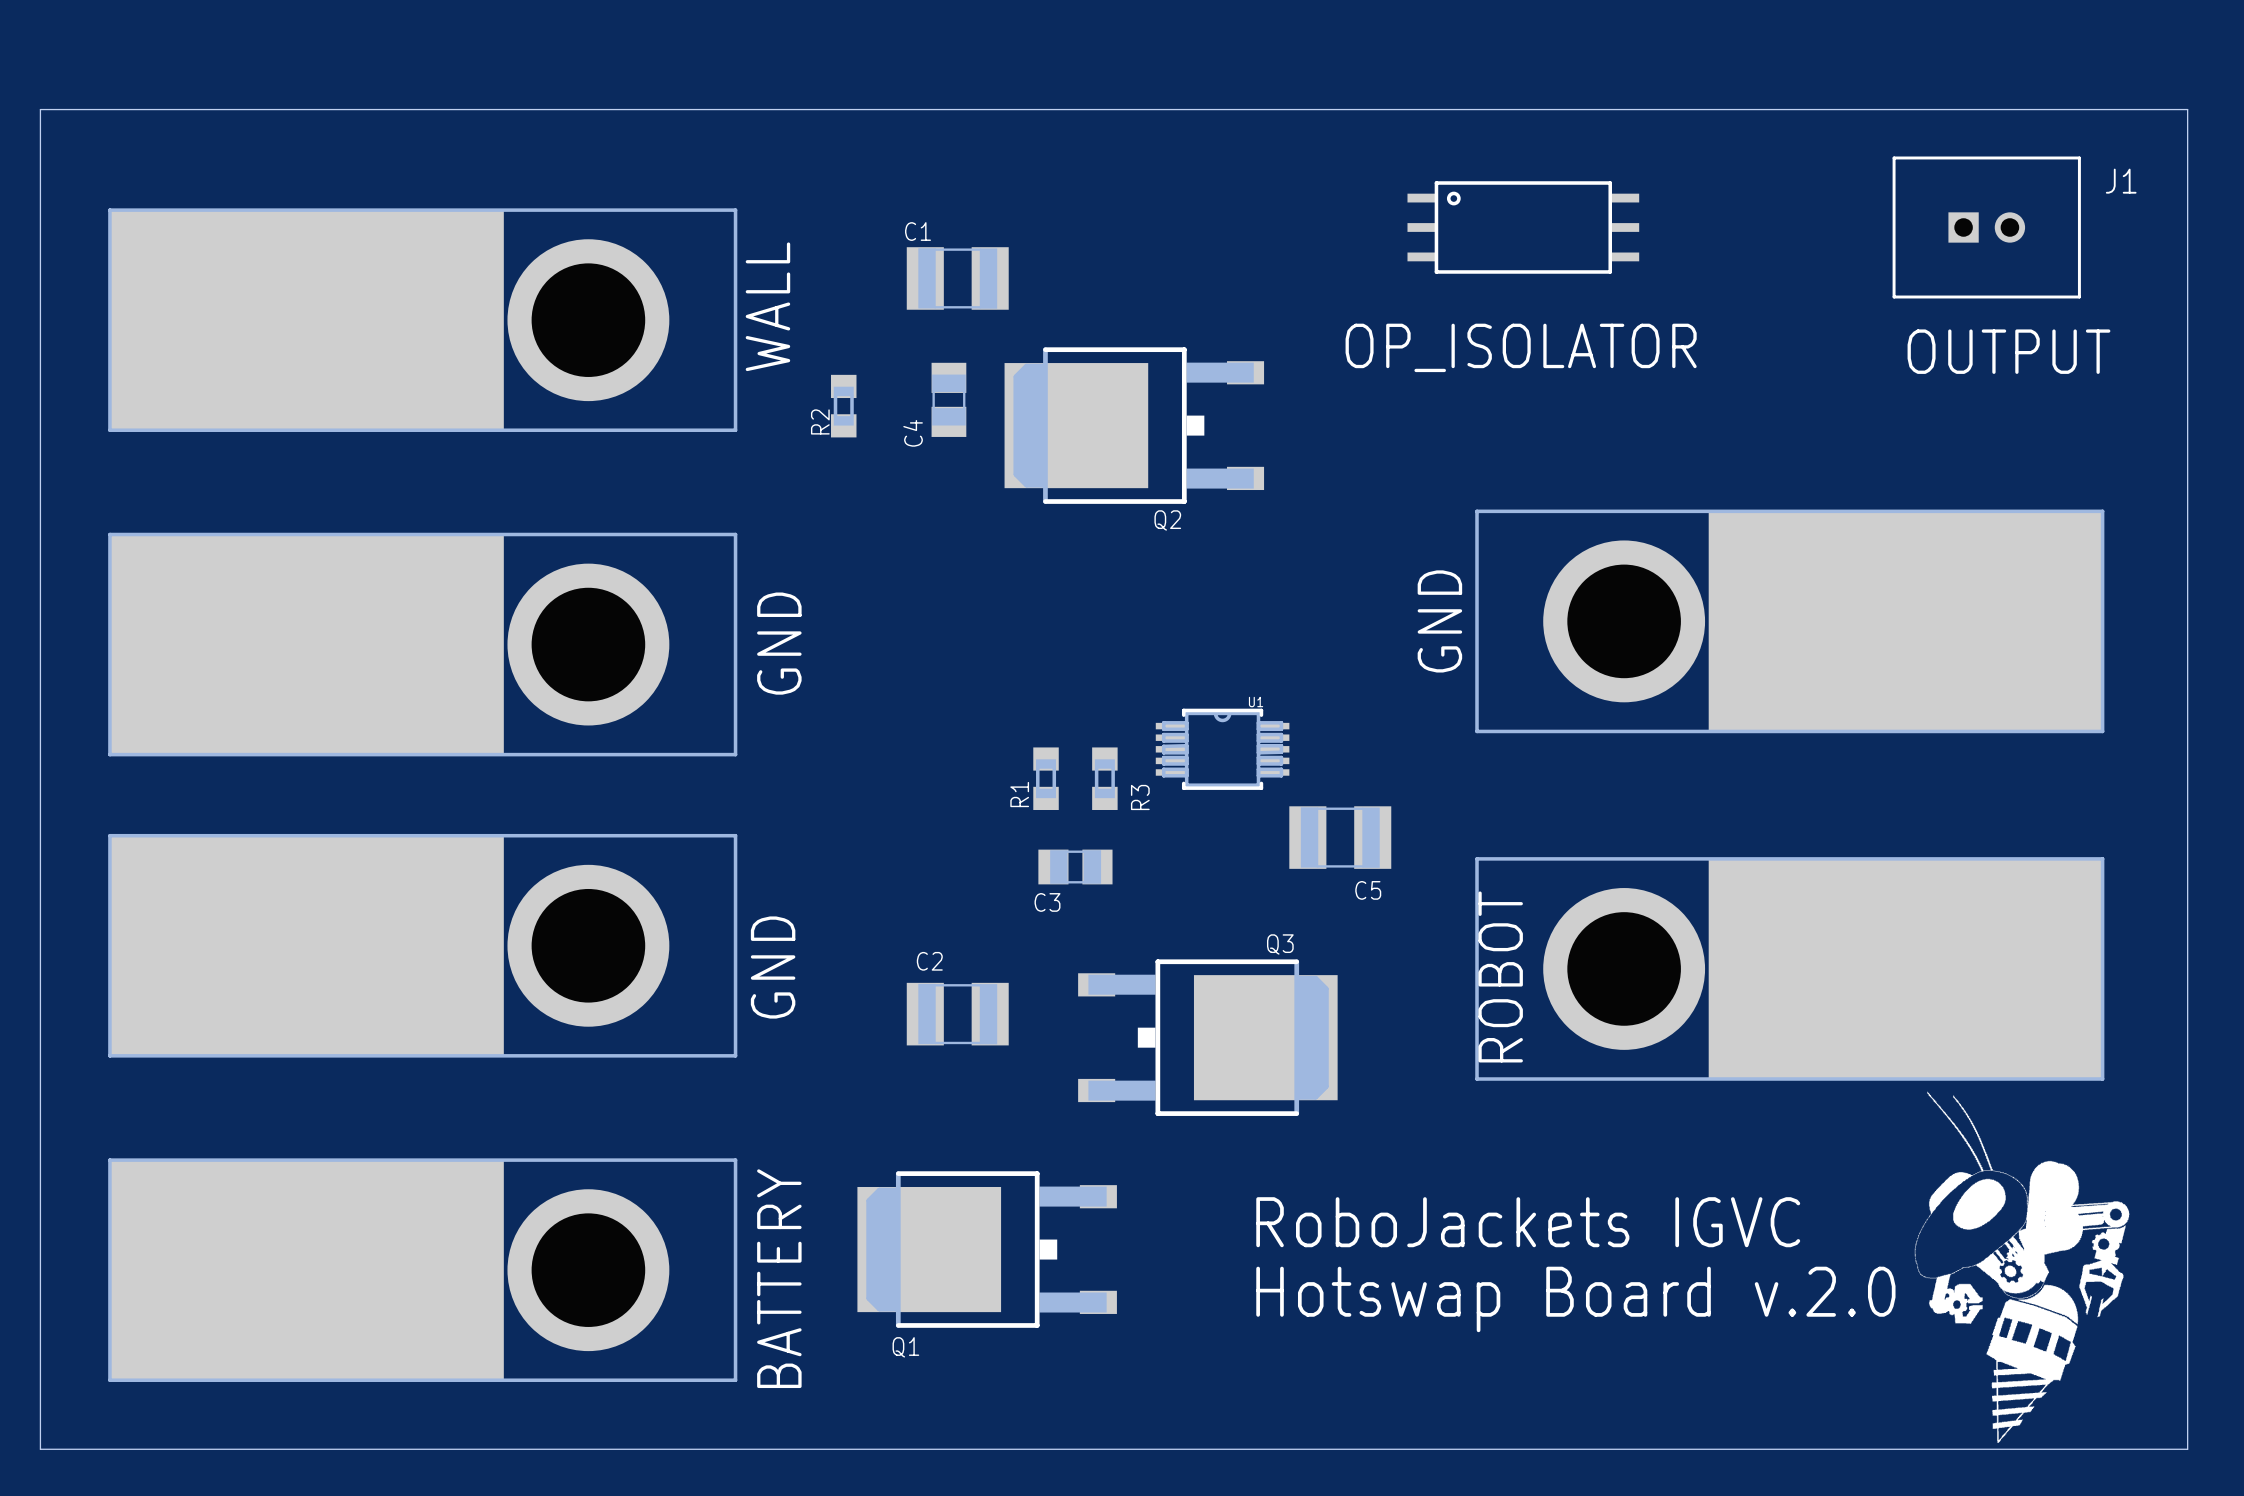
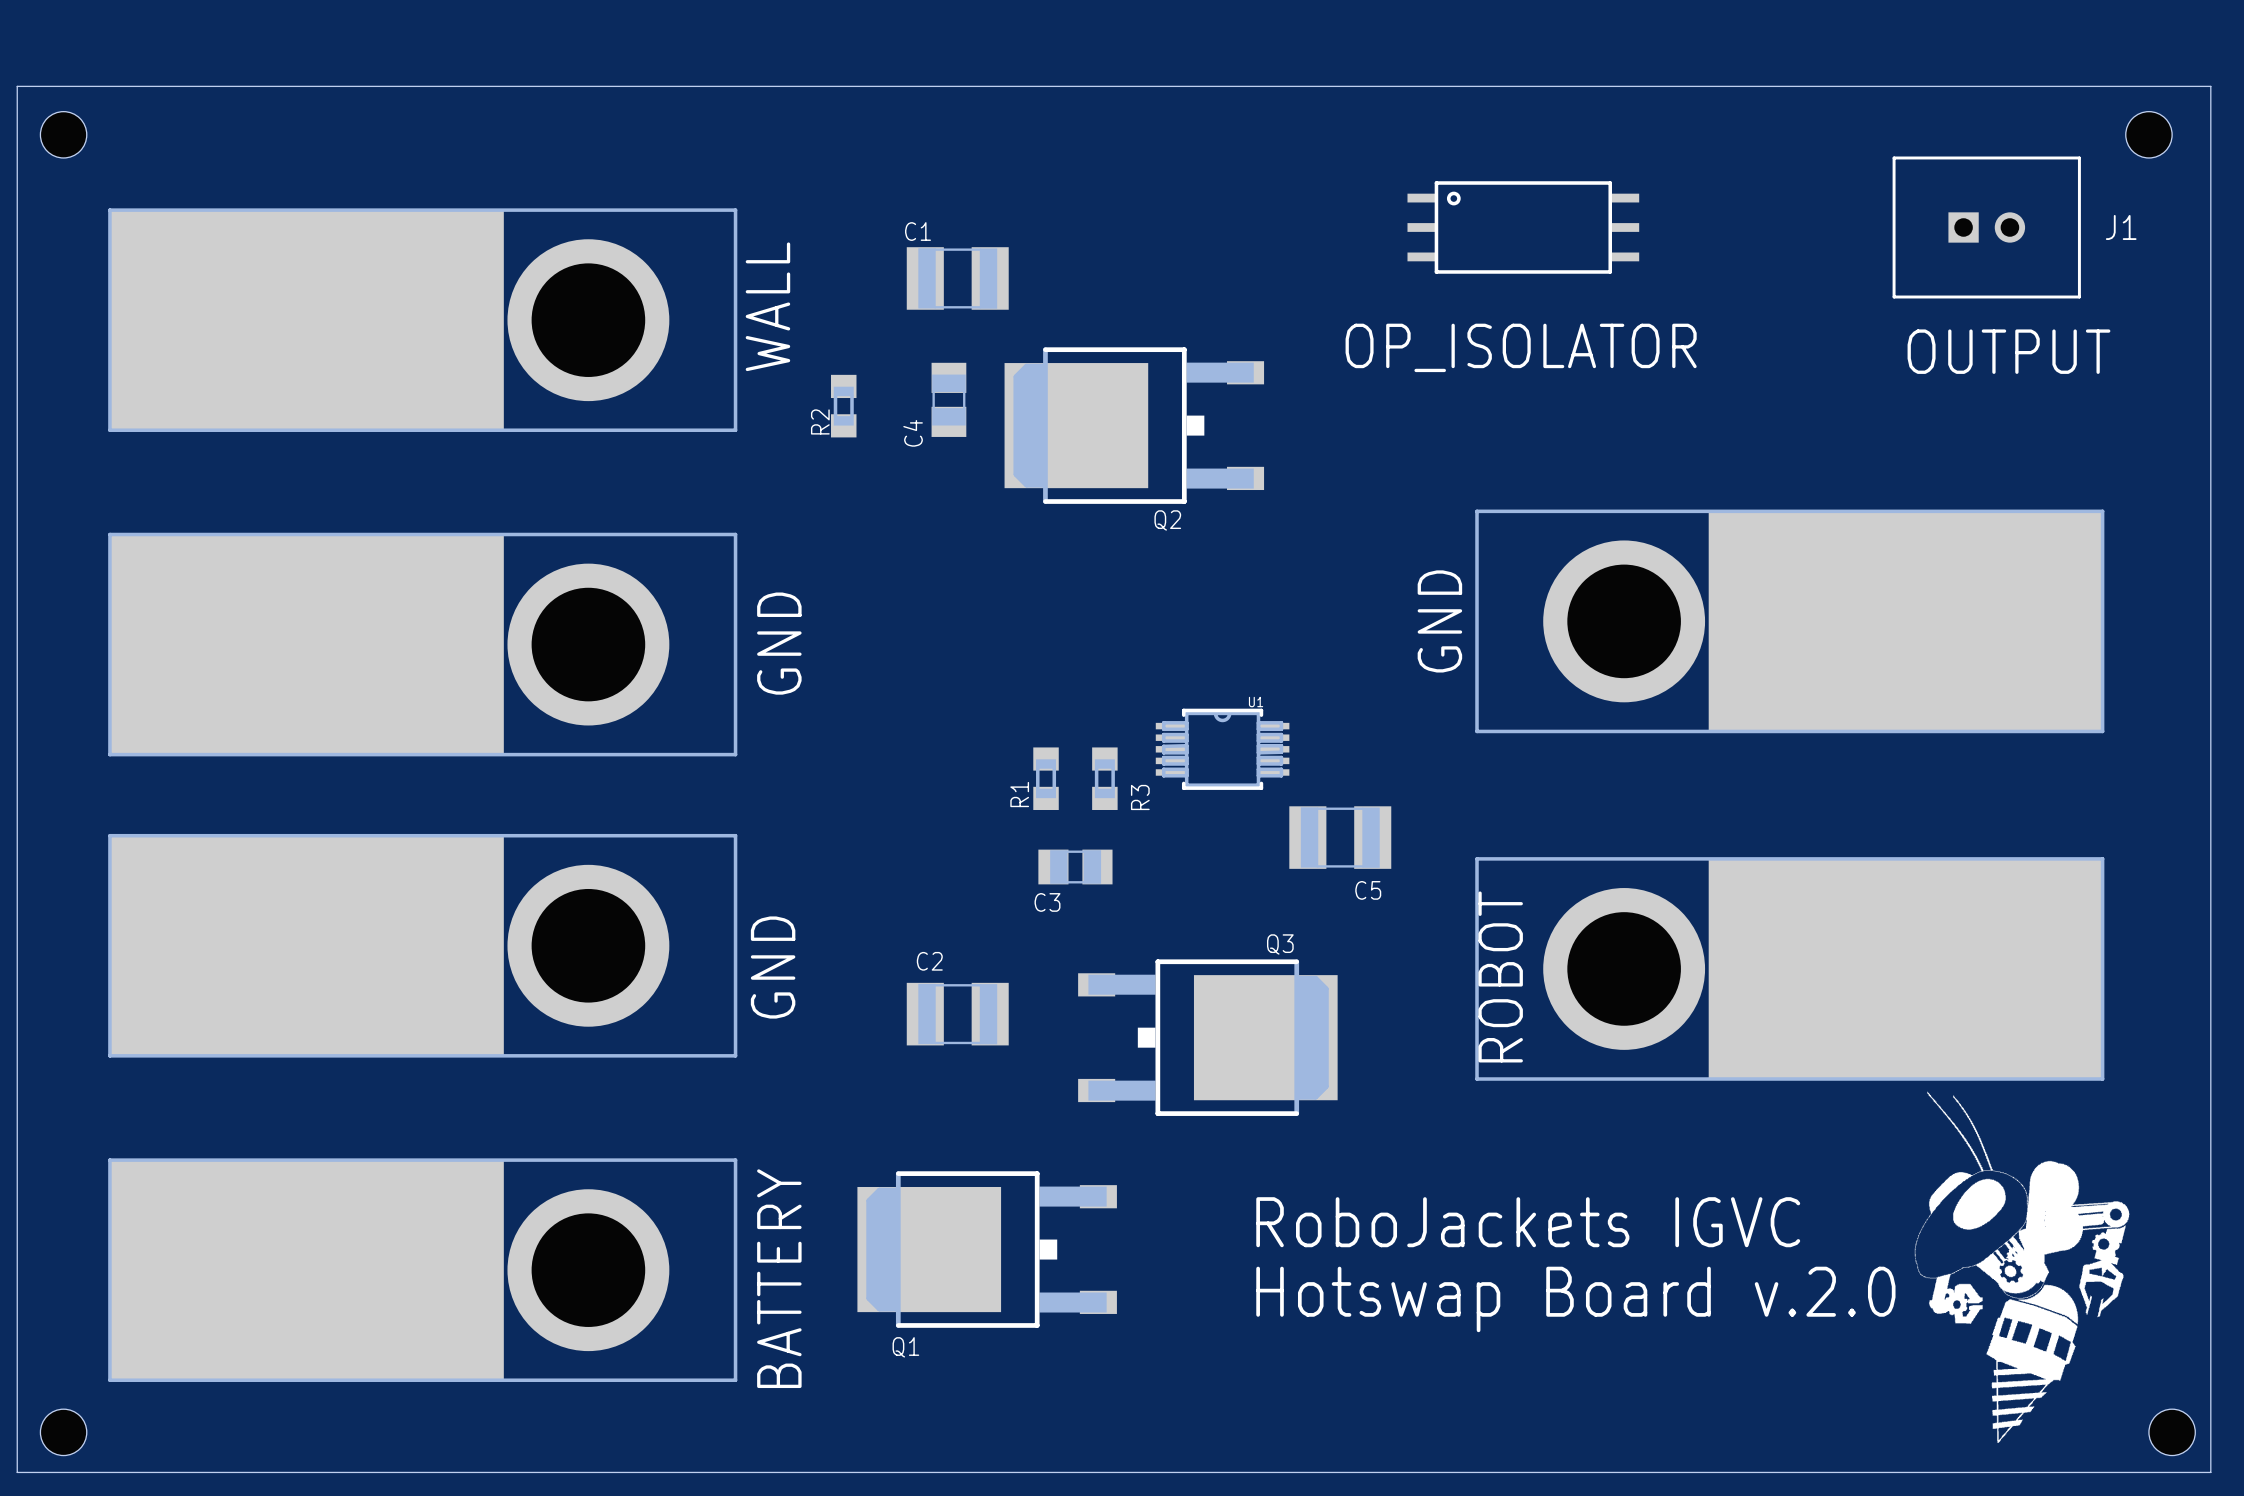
board edge: (40, 109) (2187, 109) (2187, 1449) (40, 1449) (40, 109) -> (17, 86) (17, 1472) (2210, 1472) (2210, 86) (17, 86)
hole: none -> (63, 134)
hole: none -> (2148, 134)
J1 name position: J1 (2121, 181) -> J1 (2121, 227)
hole: none -> (63, 1432)
hole: none -> (2172, 1432)

